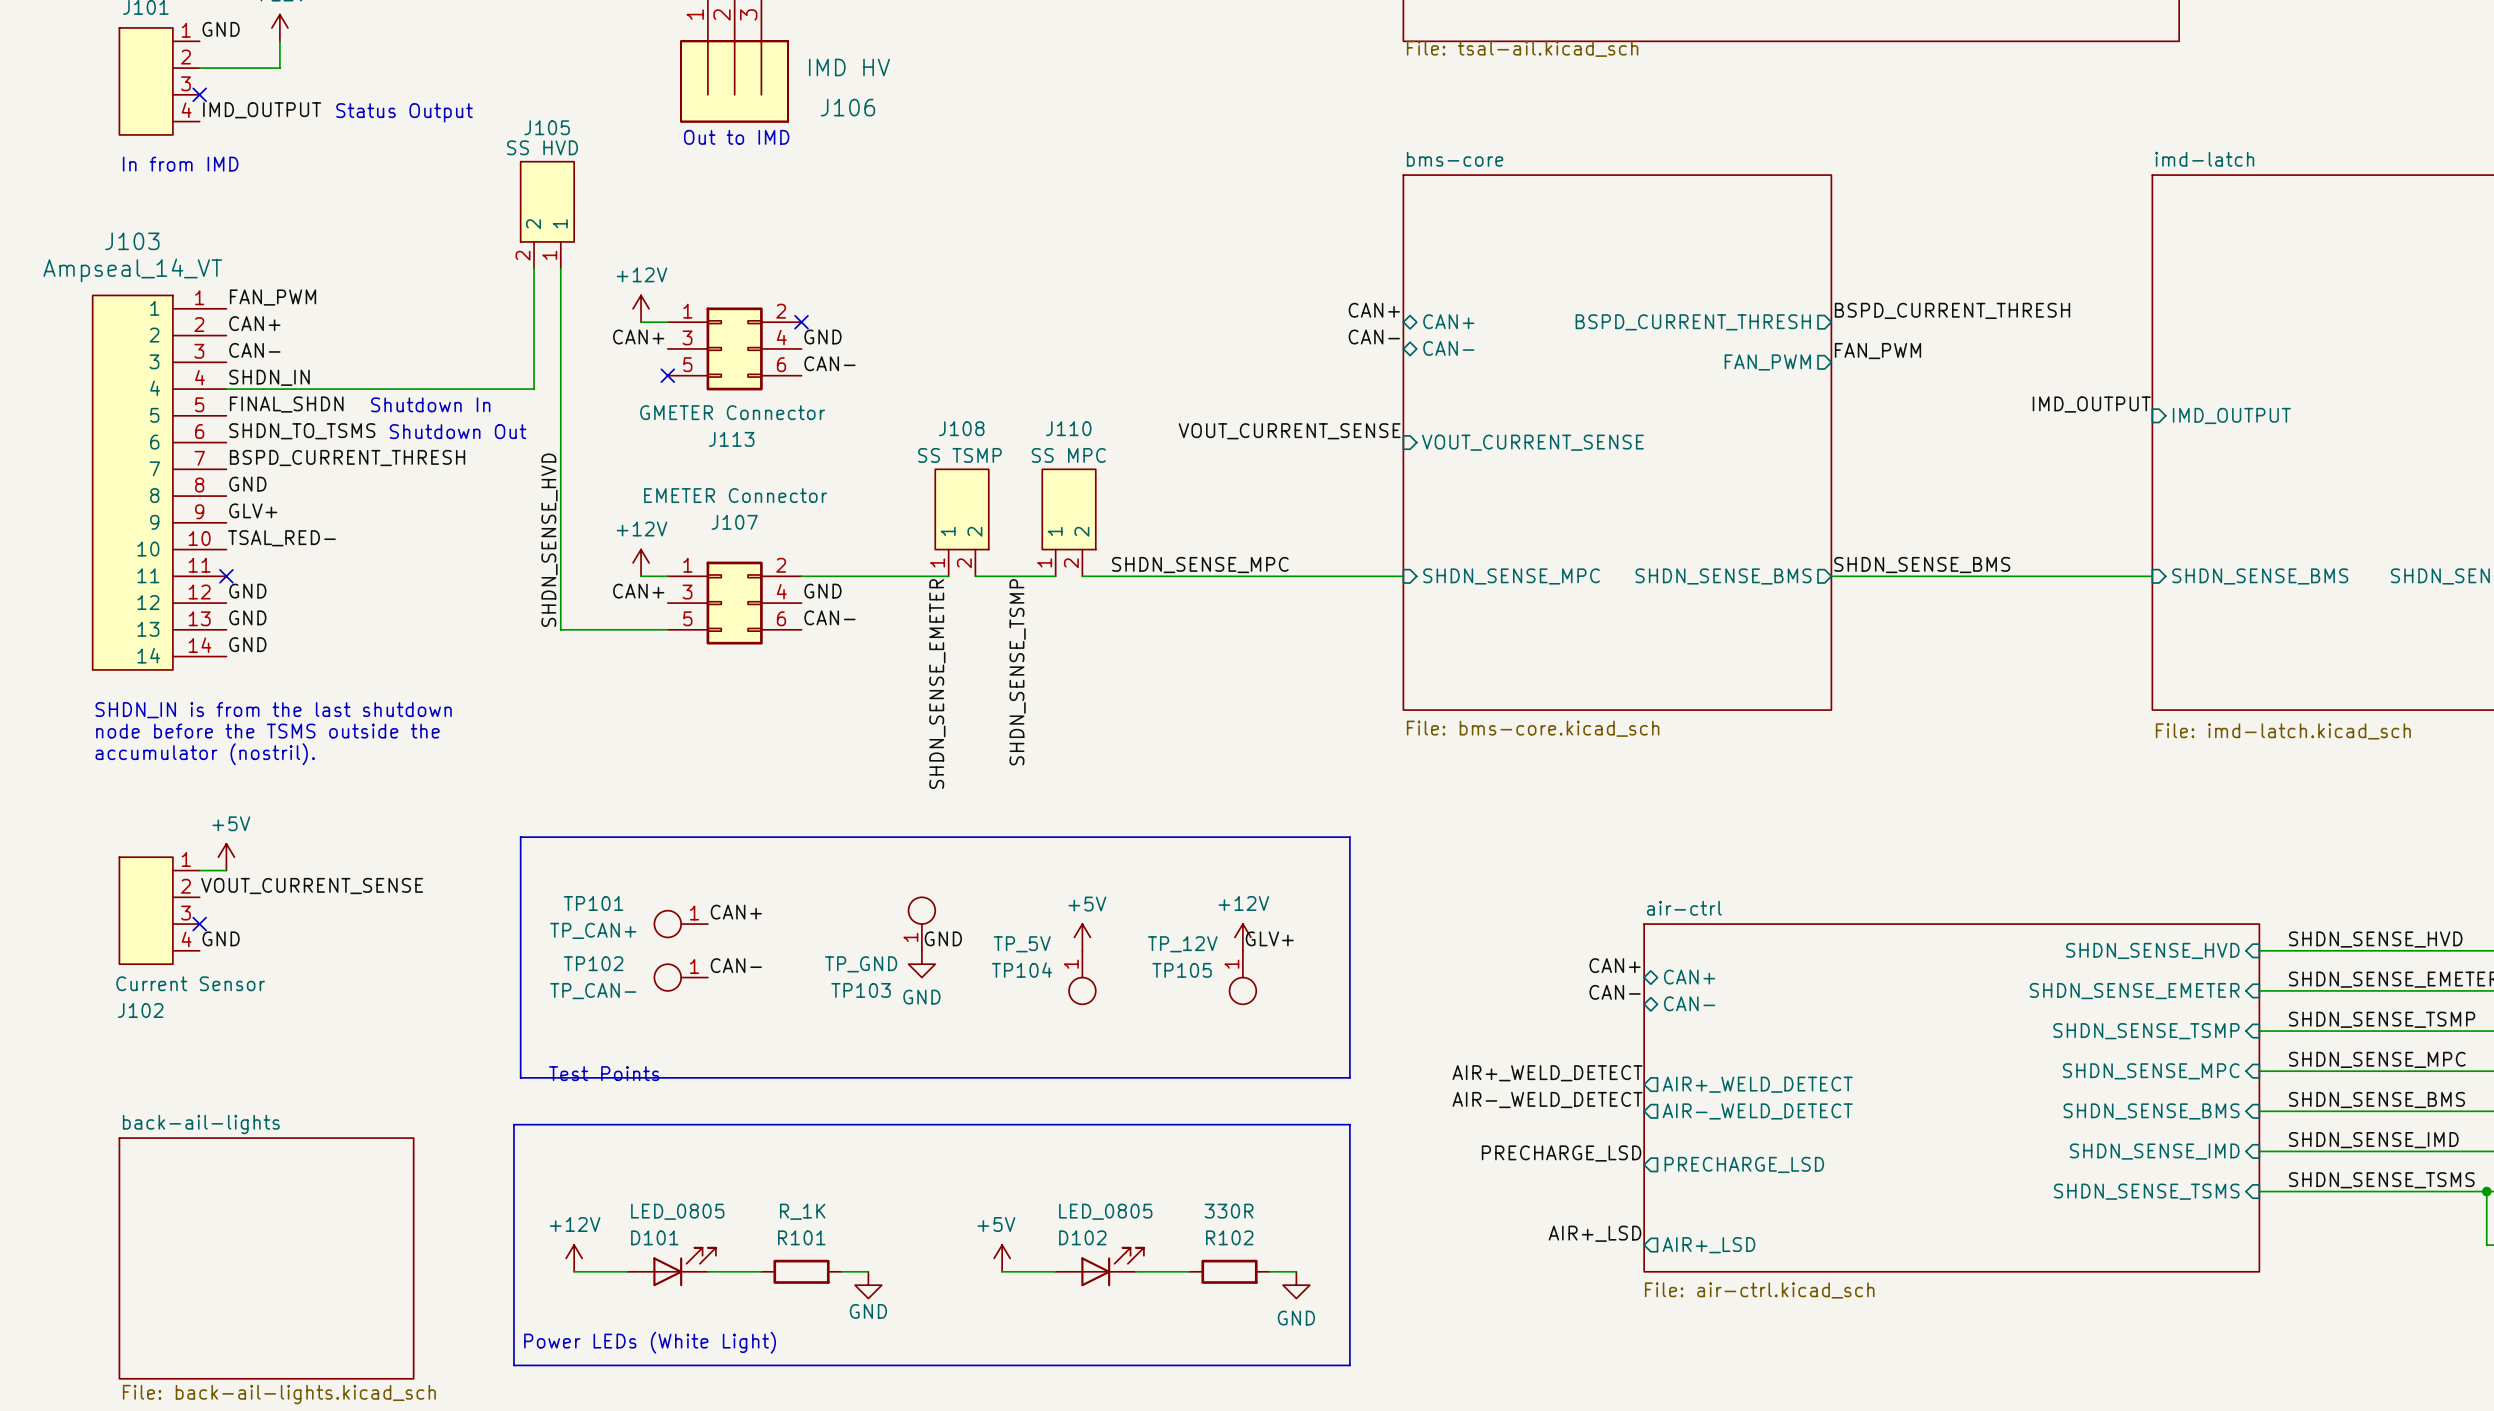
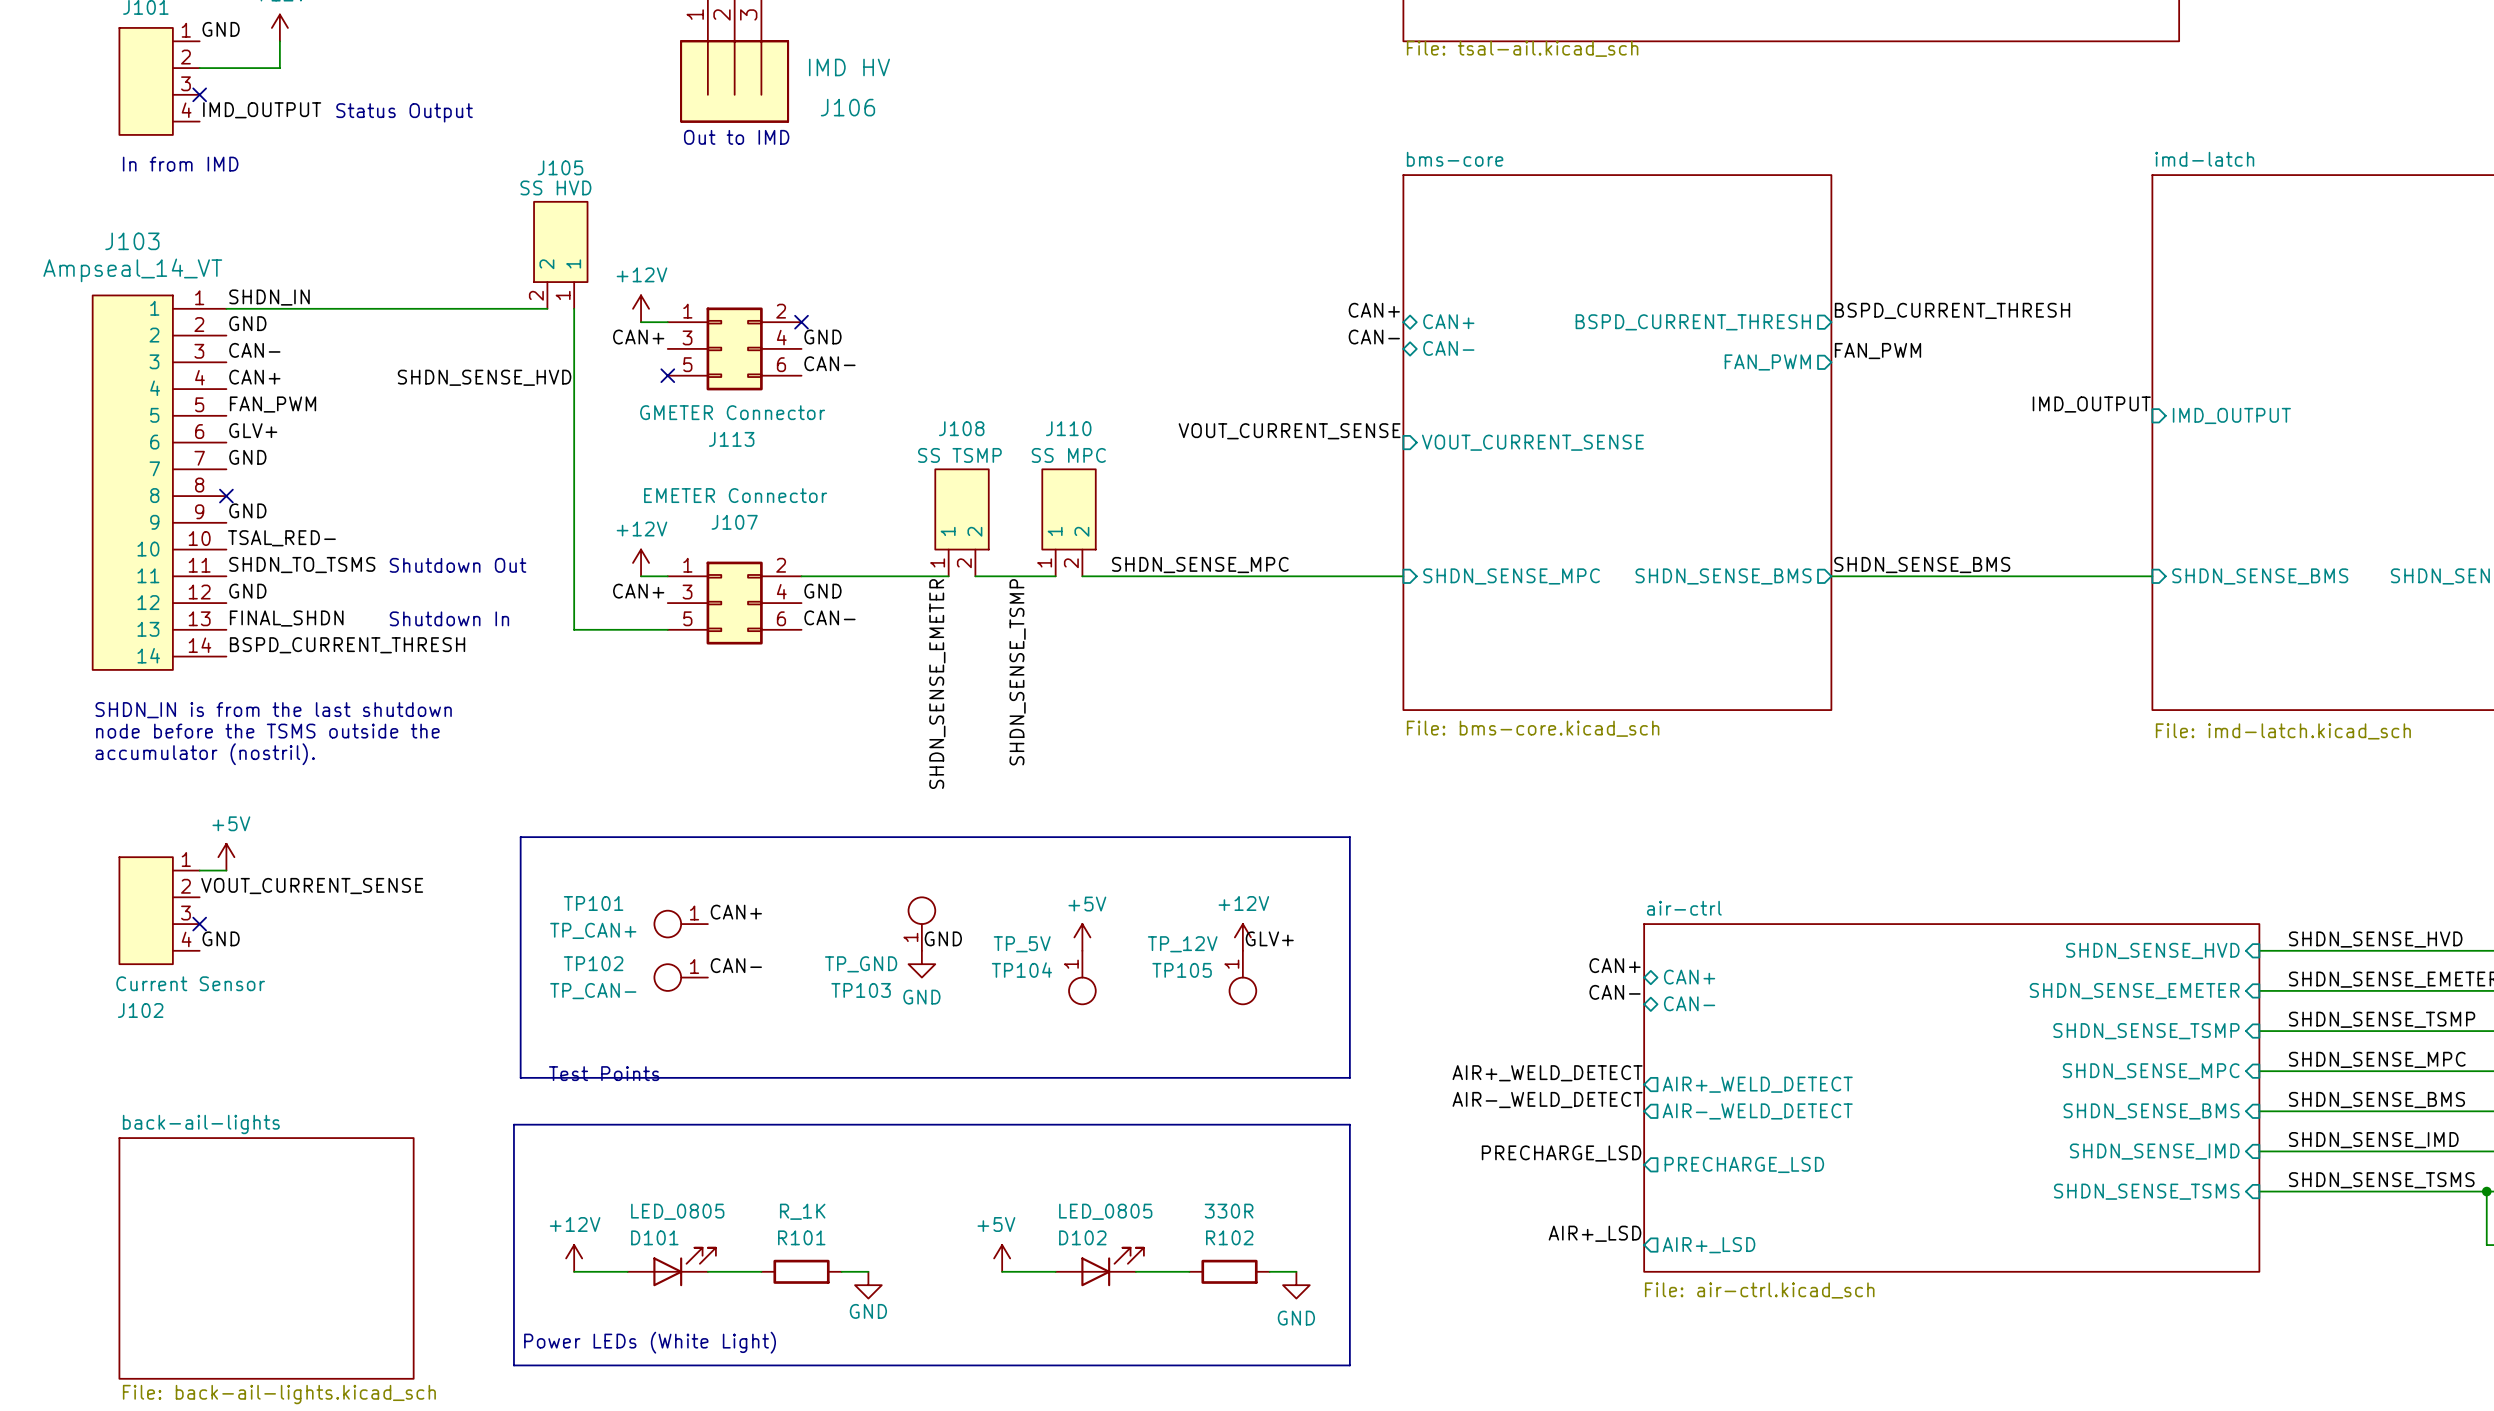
J105 position: (547, 215) -> (560, 255)
wire: (534, 268) (534, 389) (226, 389) -> none
wire: (560, 268) (560, 629) (574, 629) -> (574, 308) (574, 629)
label: FAN_PWM (273, 297) -> SHDN_IN (269, 297)
wire: none -> (226, 308) (547, 308)
label: CAN+ (254, 323) -> GND (247, 323)
label: SHDN_IN (269, 377) -> CAN+ (254, 377)
label: FINAL_SHDN (286, 404) -> FAN_PWM (273, 404)
text position: Shutdown In (430, 404) -> Shutdown In (449, 618)
label: SHDN_TO_TSMS (302, 431) -> GLV+ (253, 430)
text position: Shutdown Out (458, 431) -> Shutdown Out (458, 565)
label: BSPD_CURRENT_THRESH (347, 458) -> GND (247, 457)
label: GND (247, 484) -> none
no-connect mark: none -> (226, 496)
label: GLV+ (253, 510) -> GND (247, 510)
label rotation: 0° (549, 540) -> 90° clockwise (484, 377)
label: none -> SHDN_TO_TSMS (302, 565)
no-connect mark: (226, 576) -> none
label: GND (247, 617) -> FINAL_SHDN (286, 618)
label: GND (247, 644) -> BSPD_CURRENT_THRESH (347, 645)

